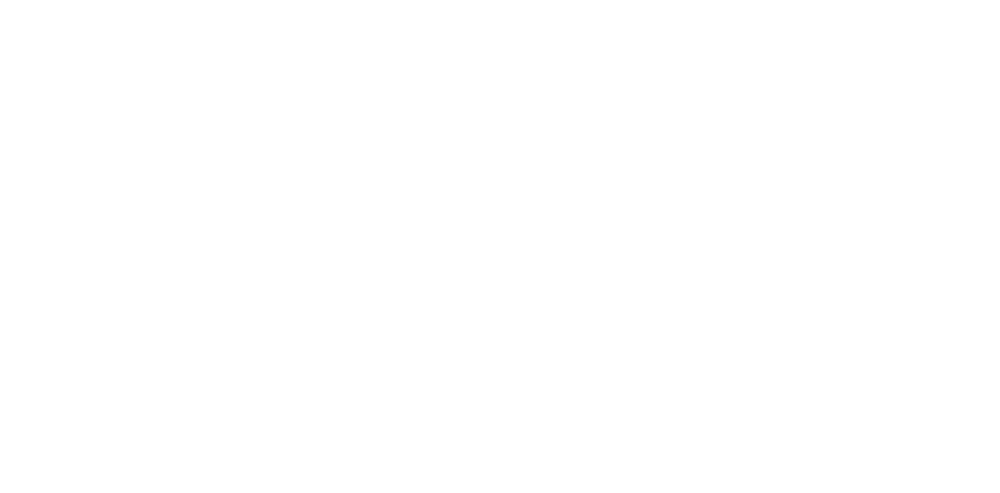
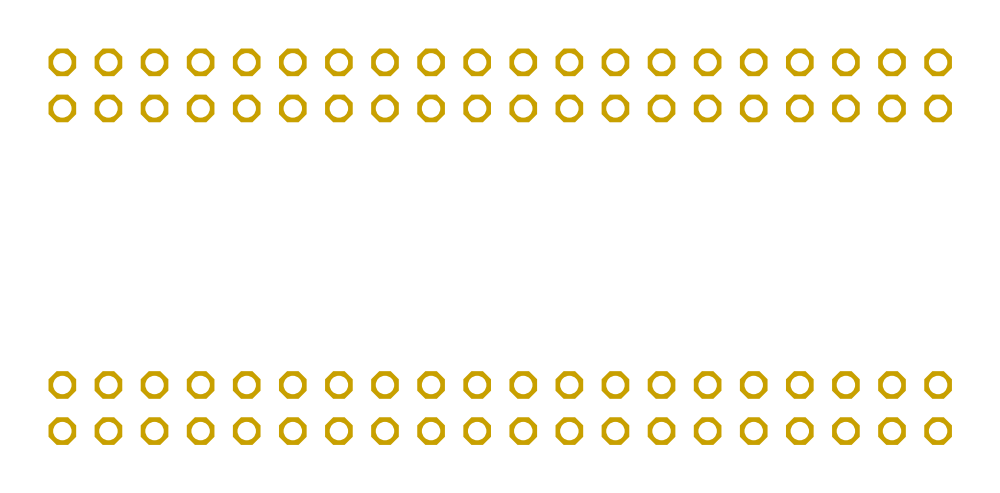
part: none -> (500, 85)
part: none -> (500, 408)

